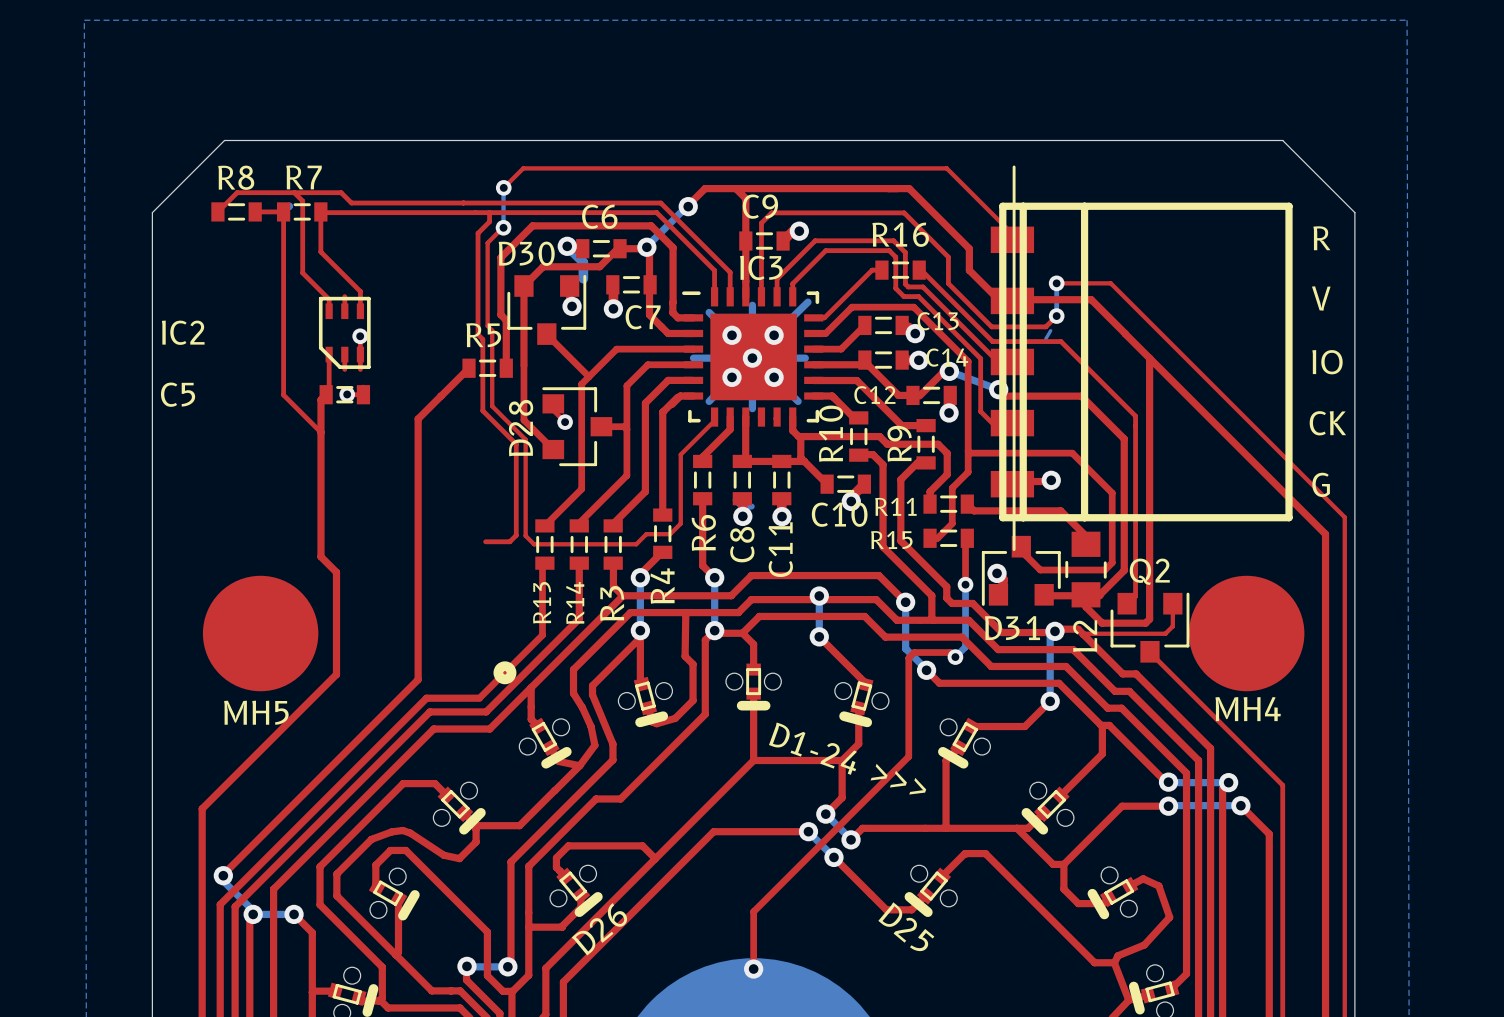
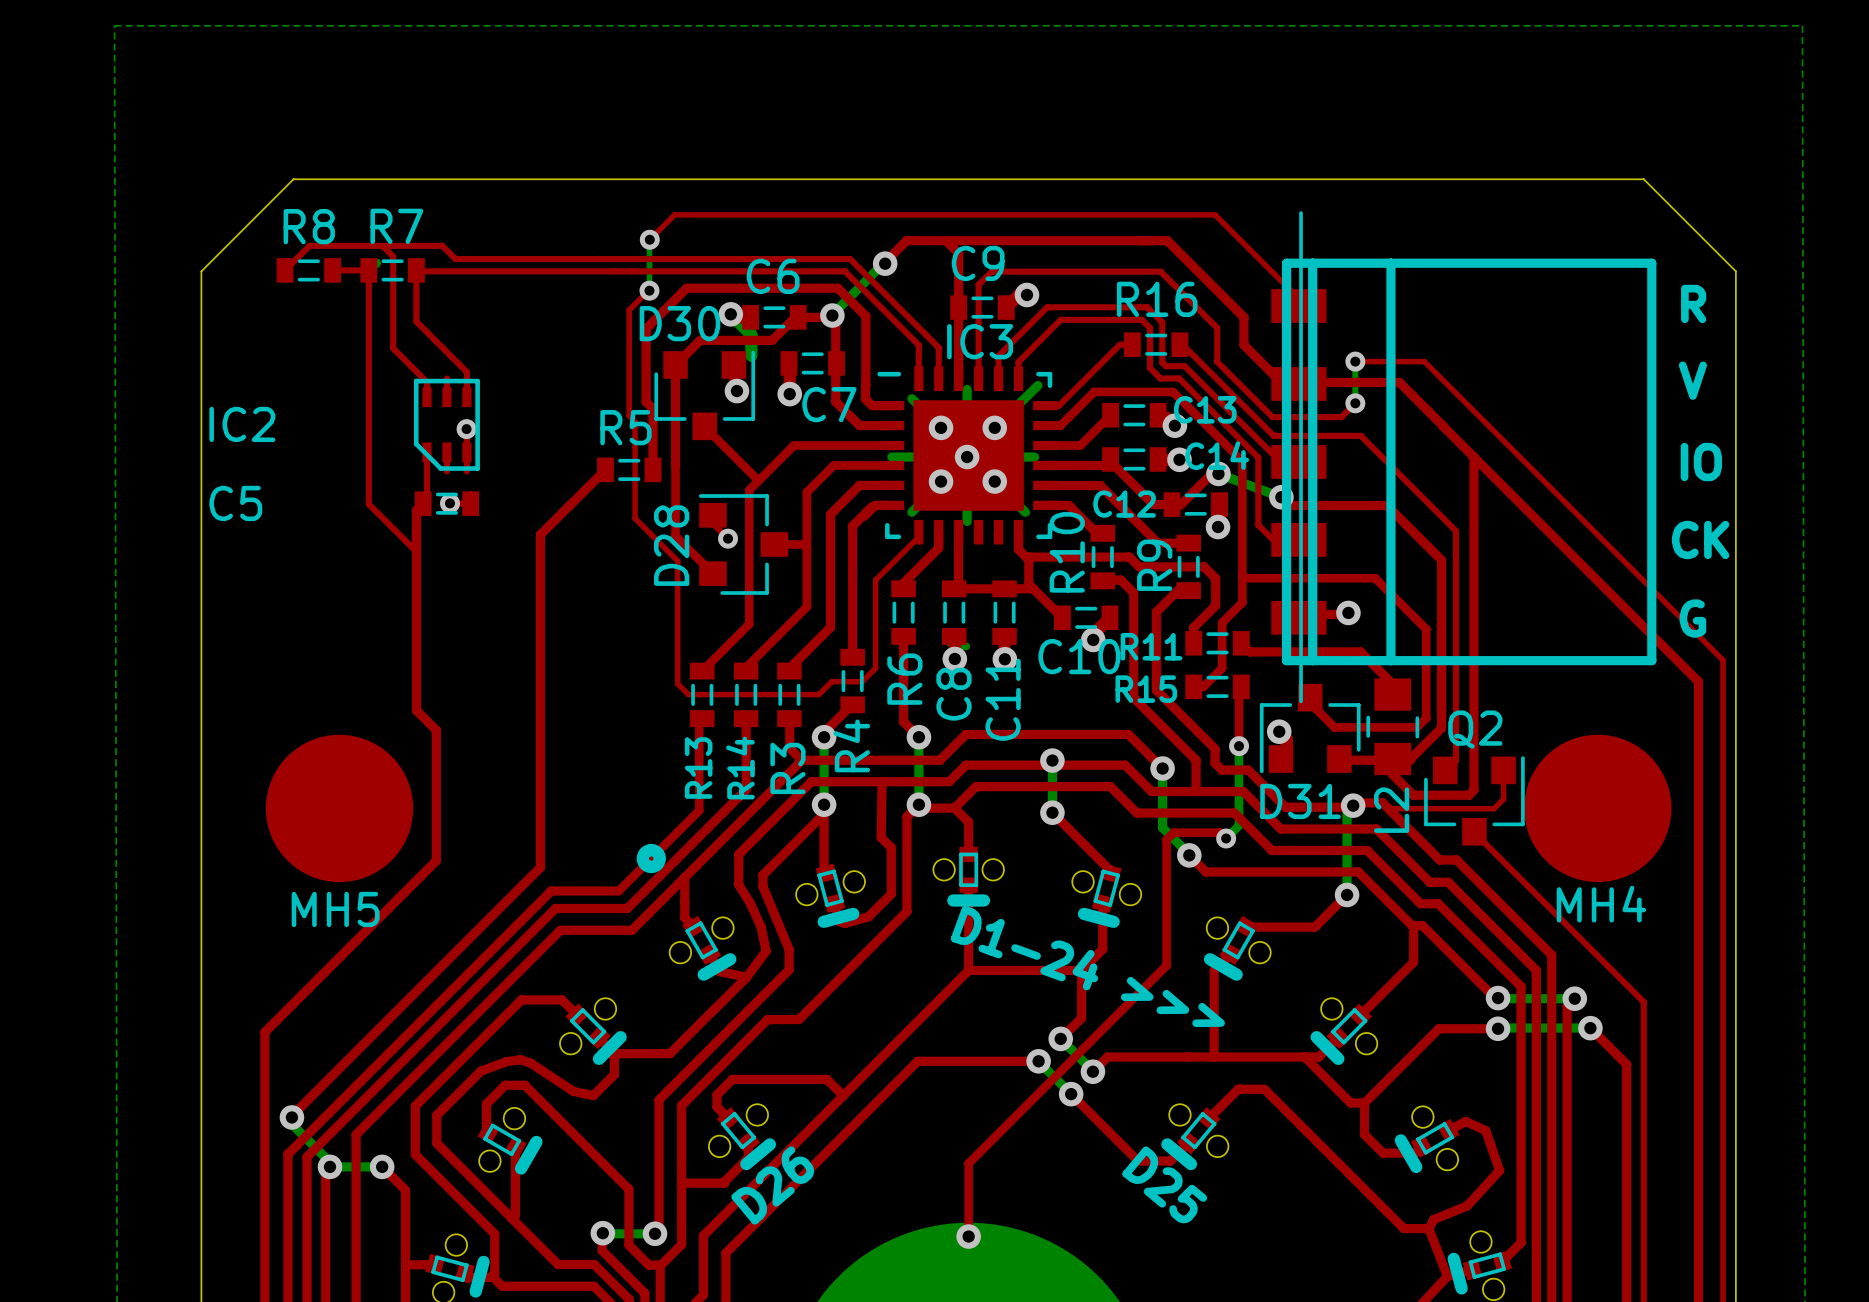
top track: (489, 212) (489, 221) (478, 233) (478, 334) (482, 339) (482, 410) (516, 444) (516, 535) (509, 541) (485, 541) -> none
bottom track: (1050, 330) (1045, 338) -> none

